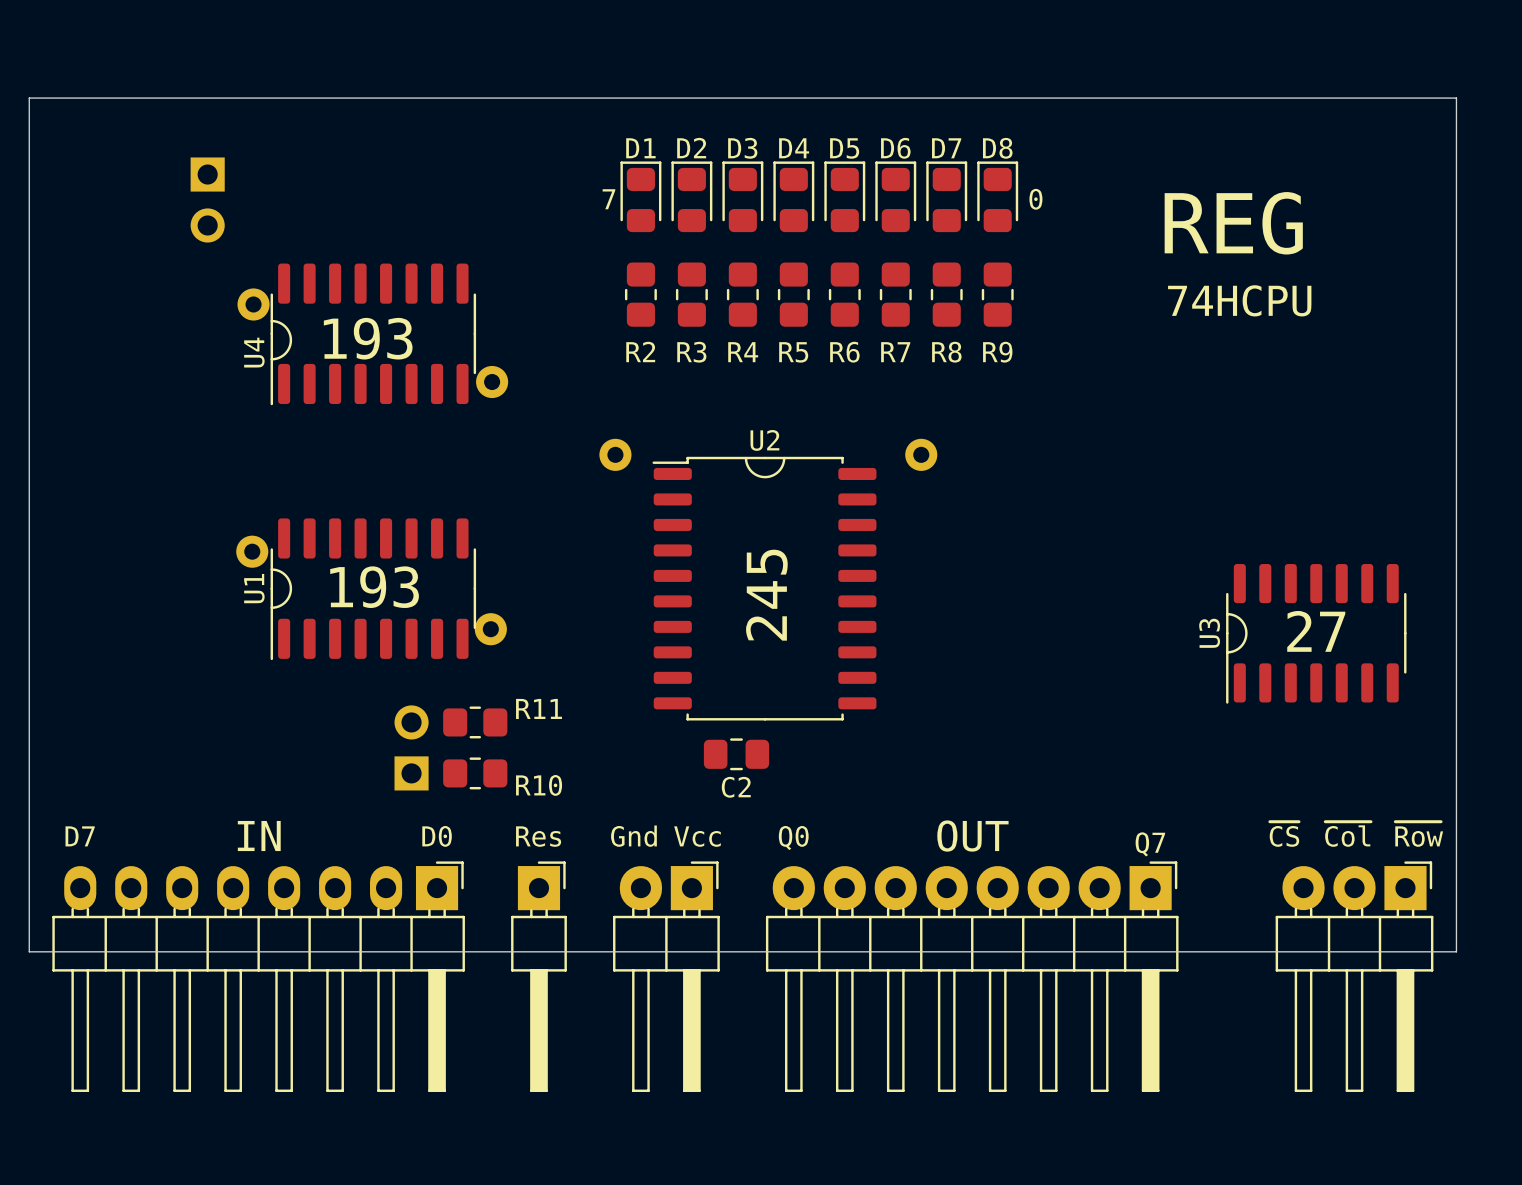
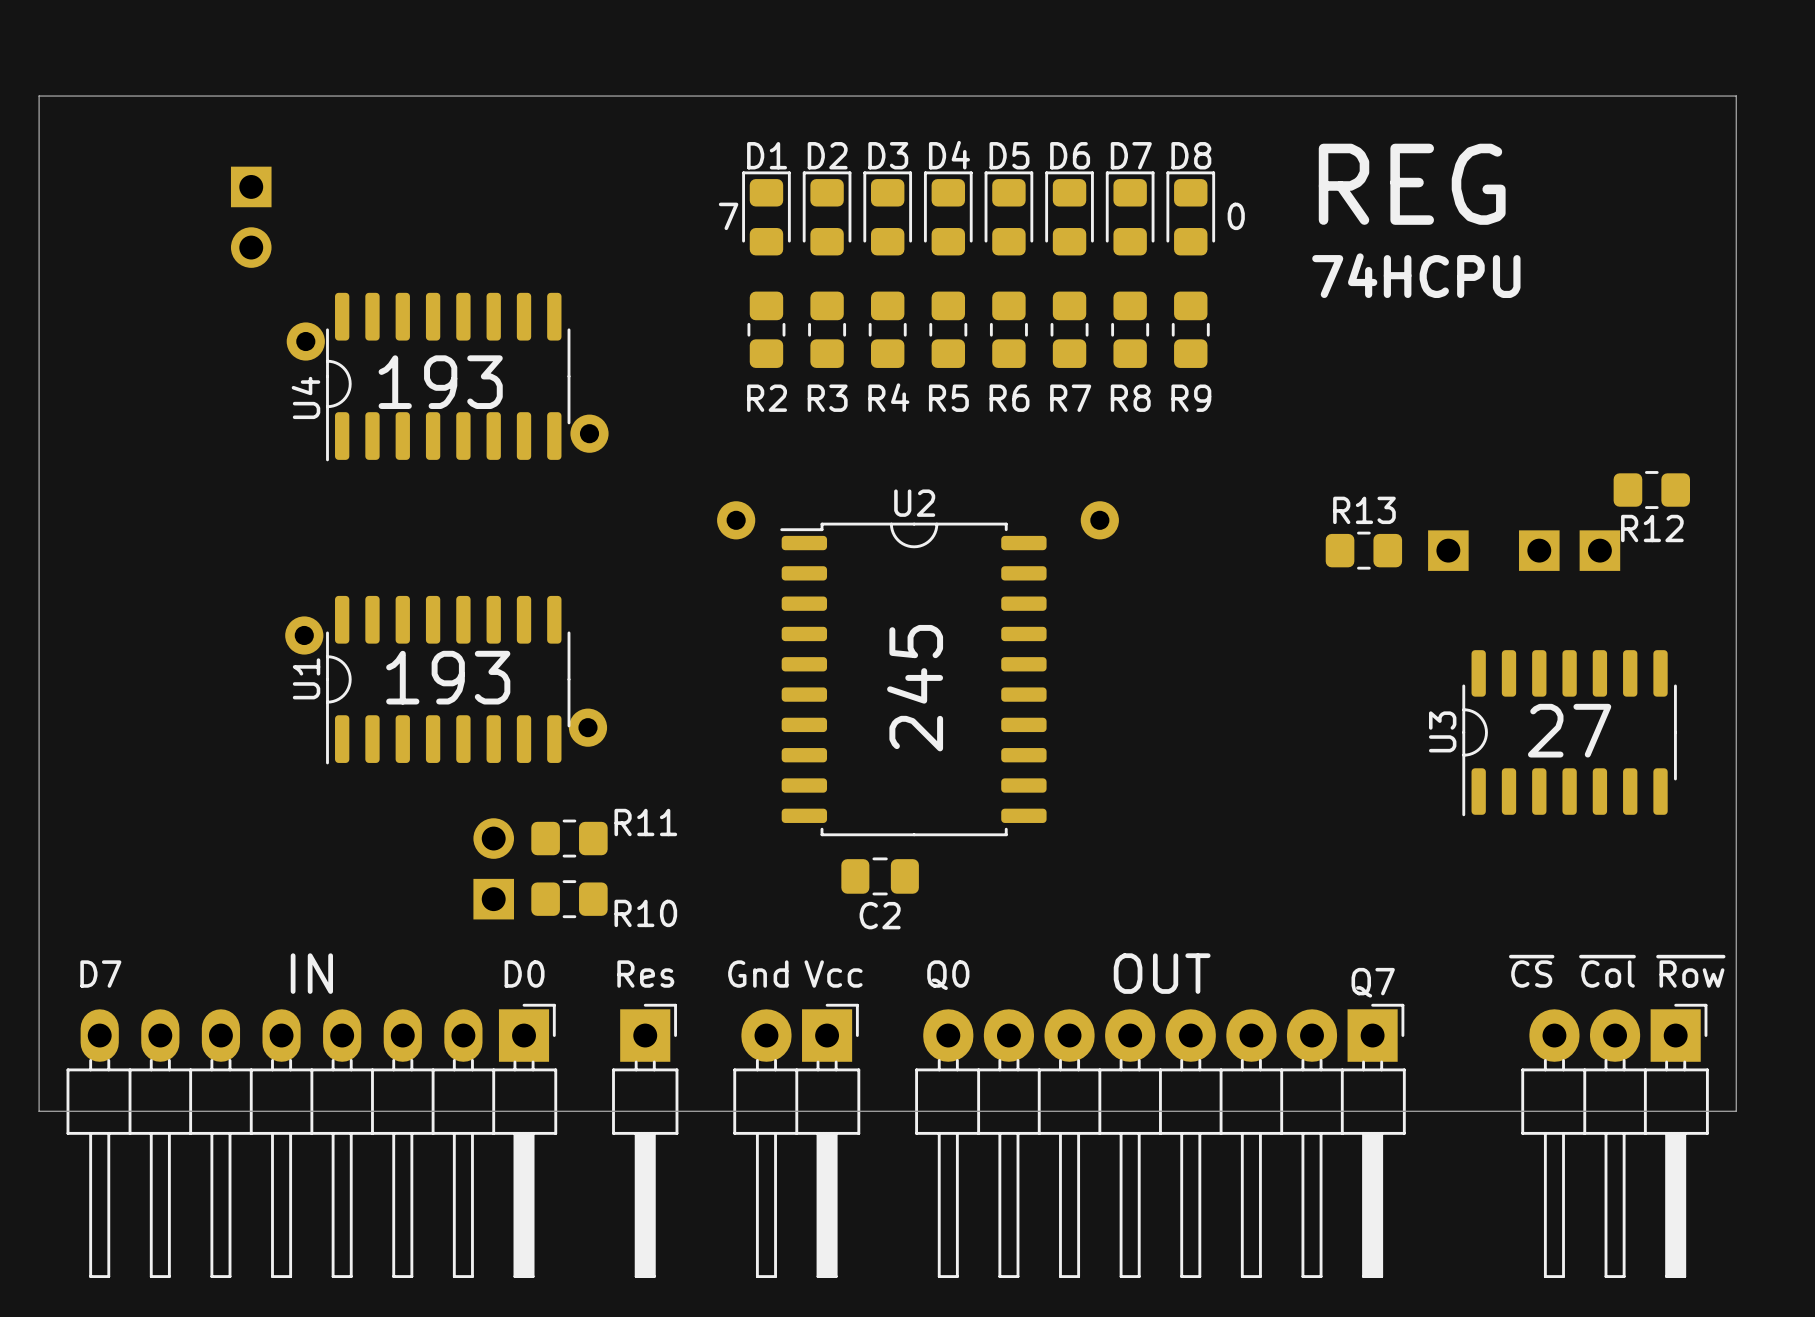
text position: REG (1233, 223) -> REG (1412, 184)
text position: 74HCPU (1239, 300) -> 74HCPU (1416, 275)
R12: none -> (1651, 490)
R13: none -> (1363, 550)
part: none -> (1448, 550)
part: none -> (1539, 550)
part: none -> (1599, 550)

